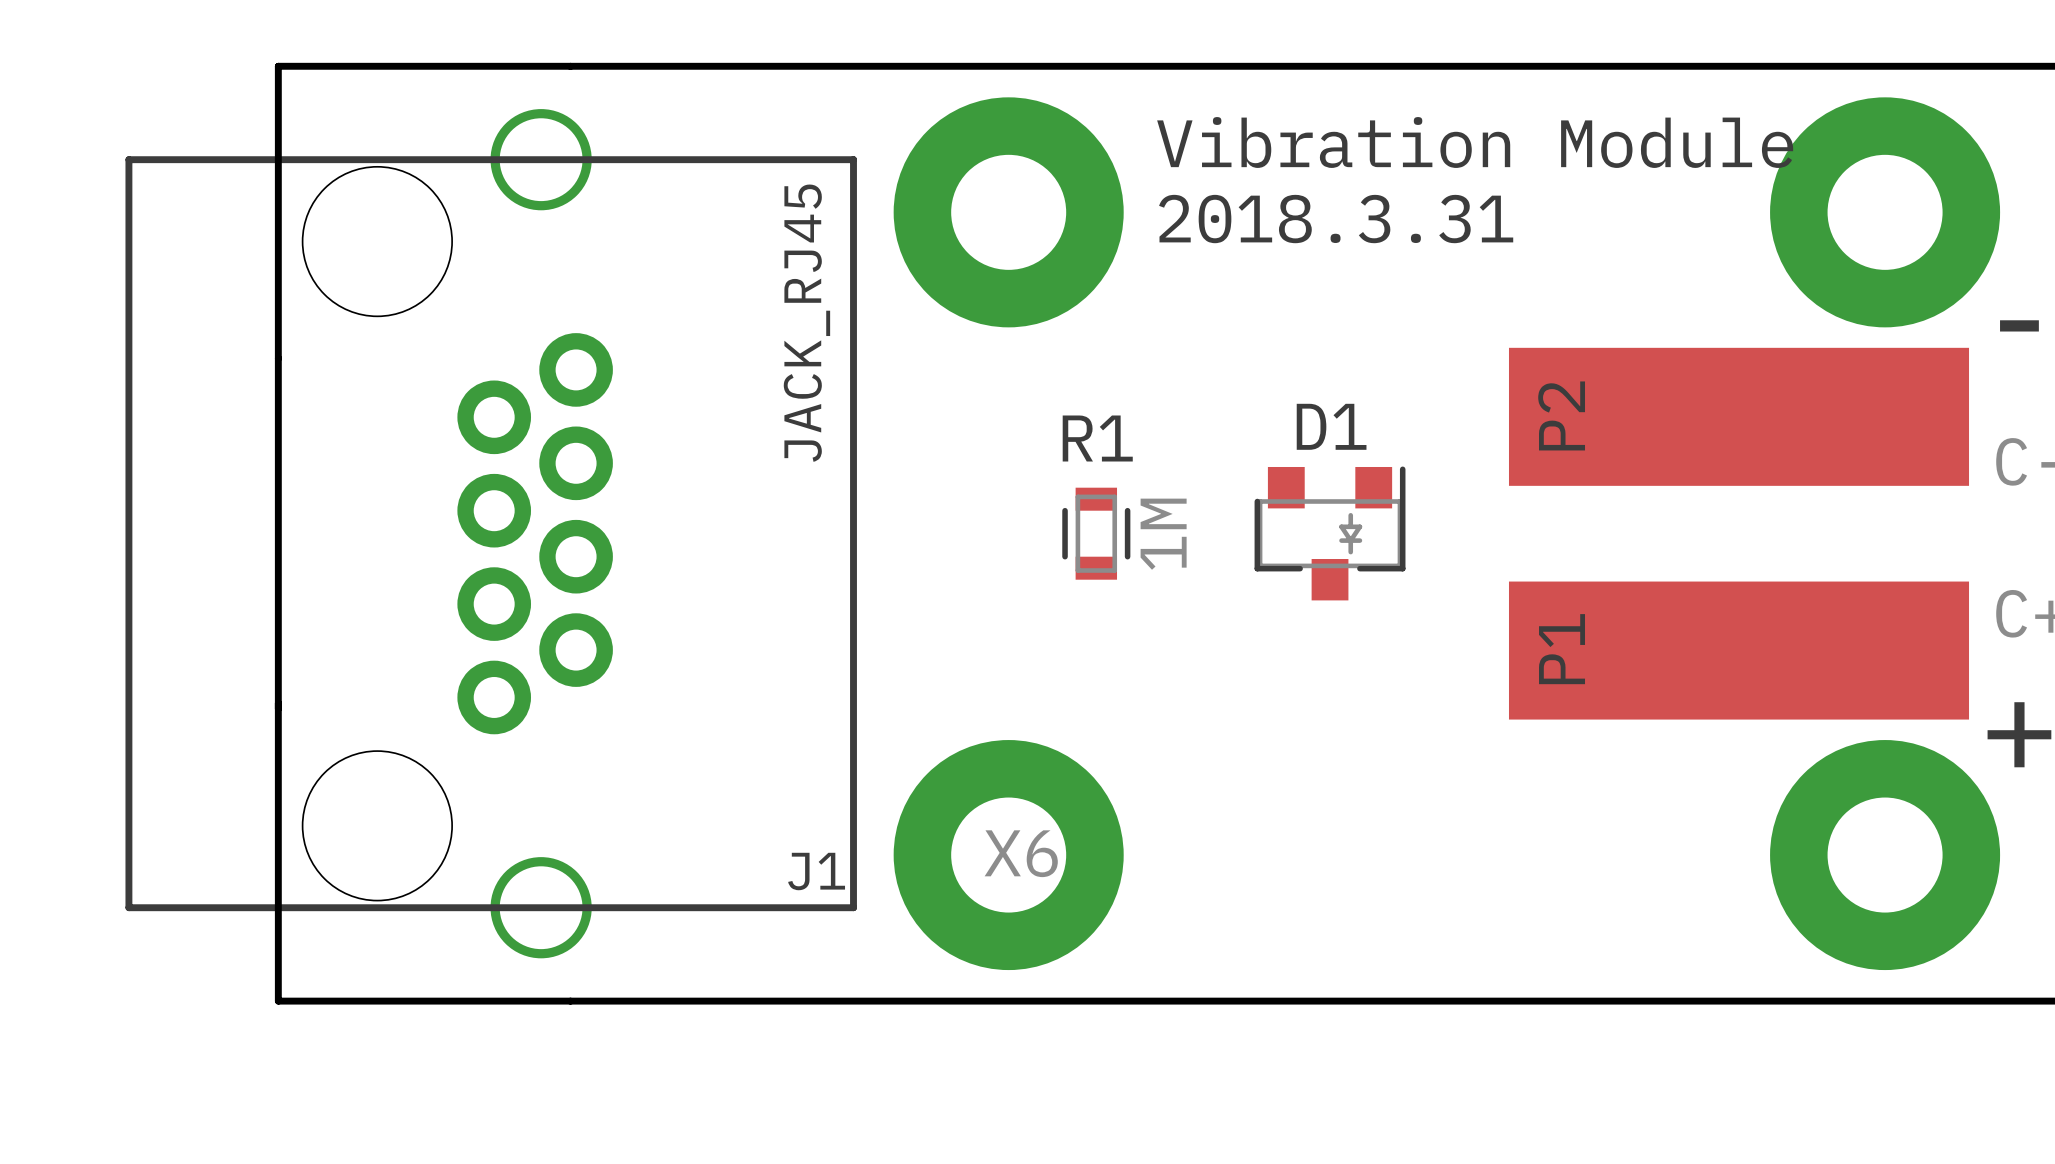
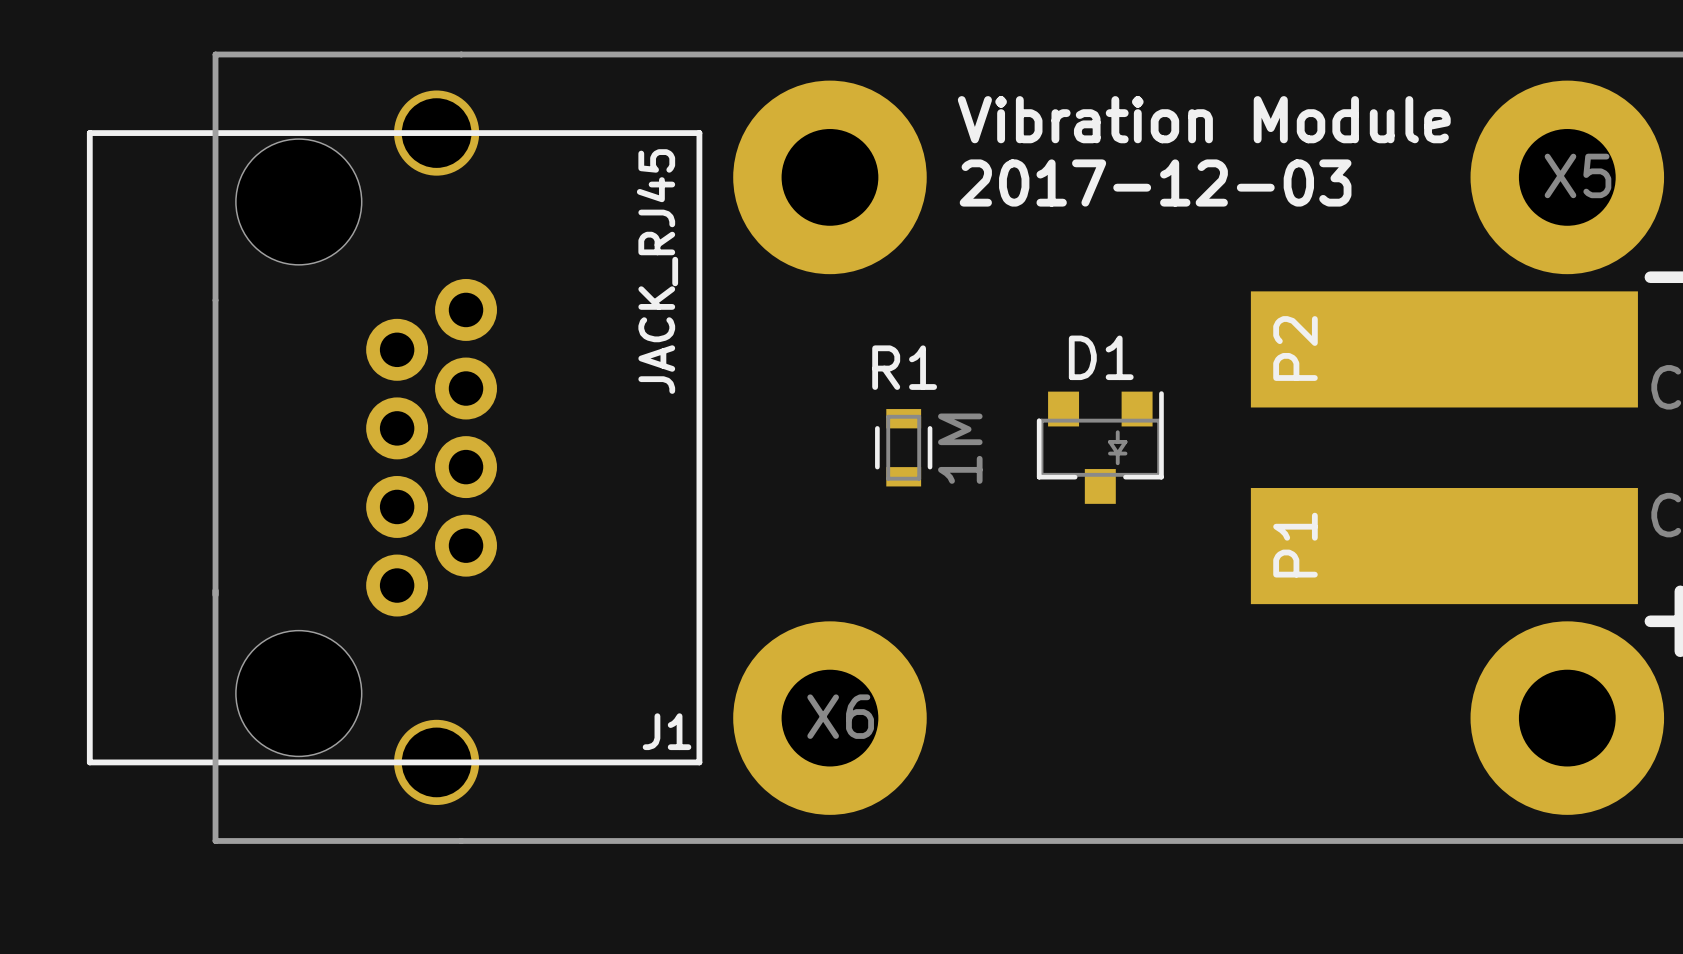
X5 name: none -> X5 (1577, 175)
text: 2018.3.31 (1336, 219) -> 2017-12-03 (1155, 182)

